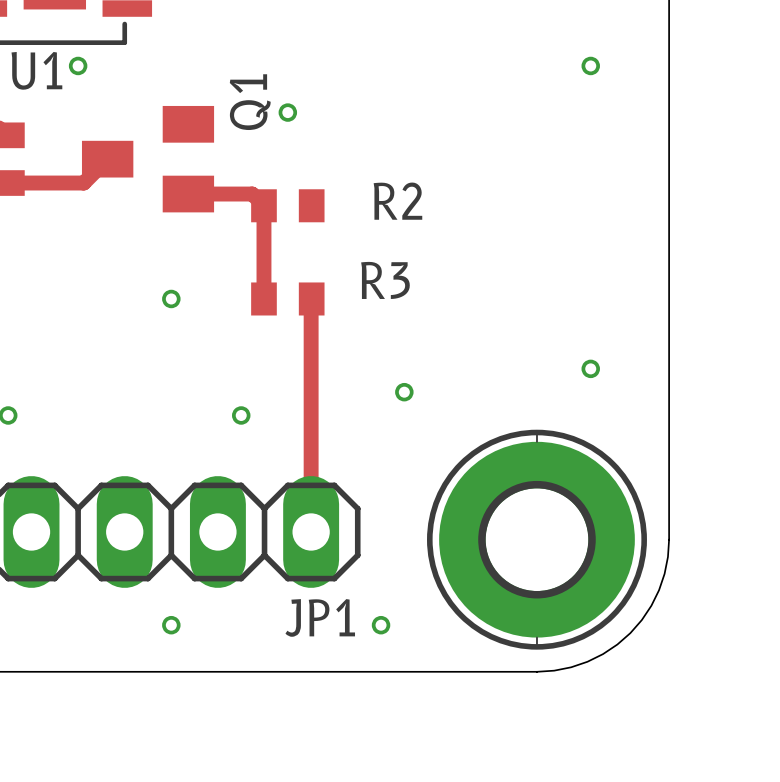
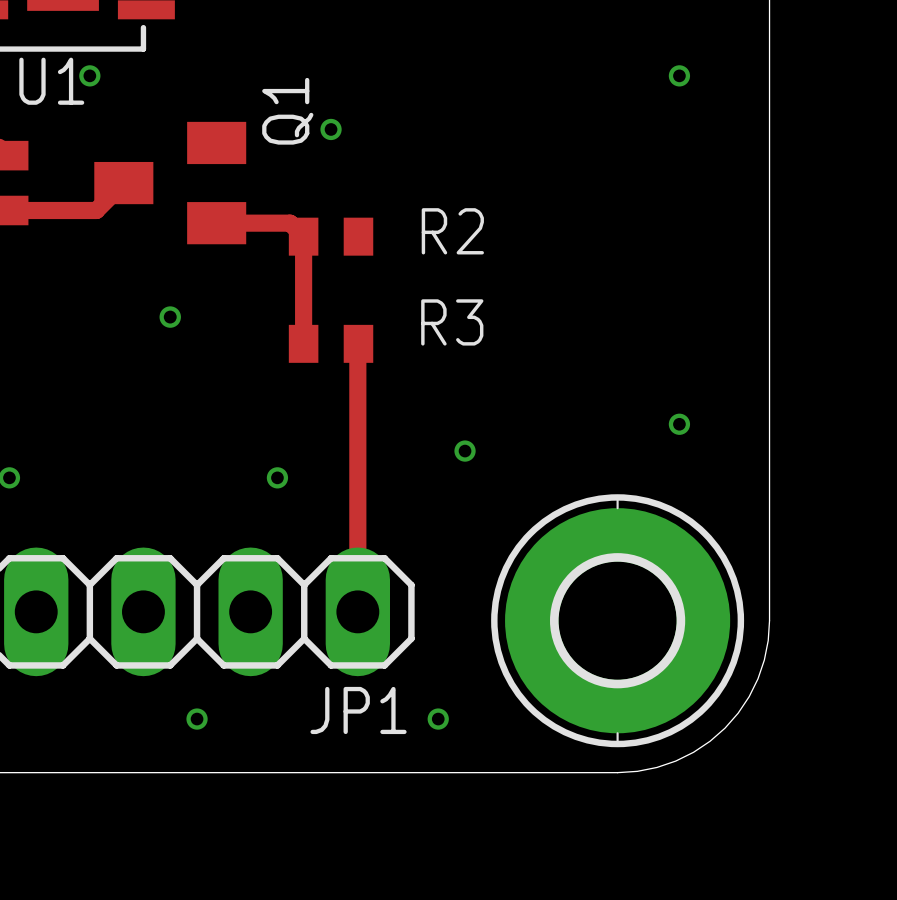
via position: (171, 298) -> (170, 317)

